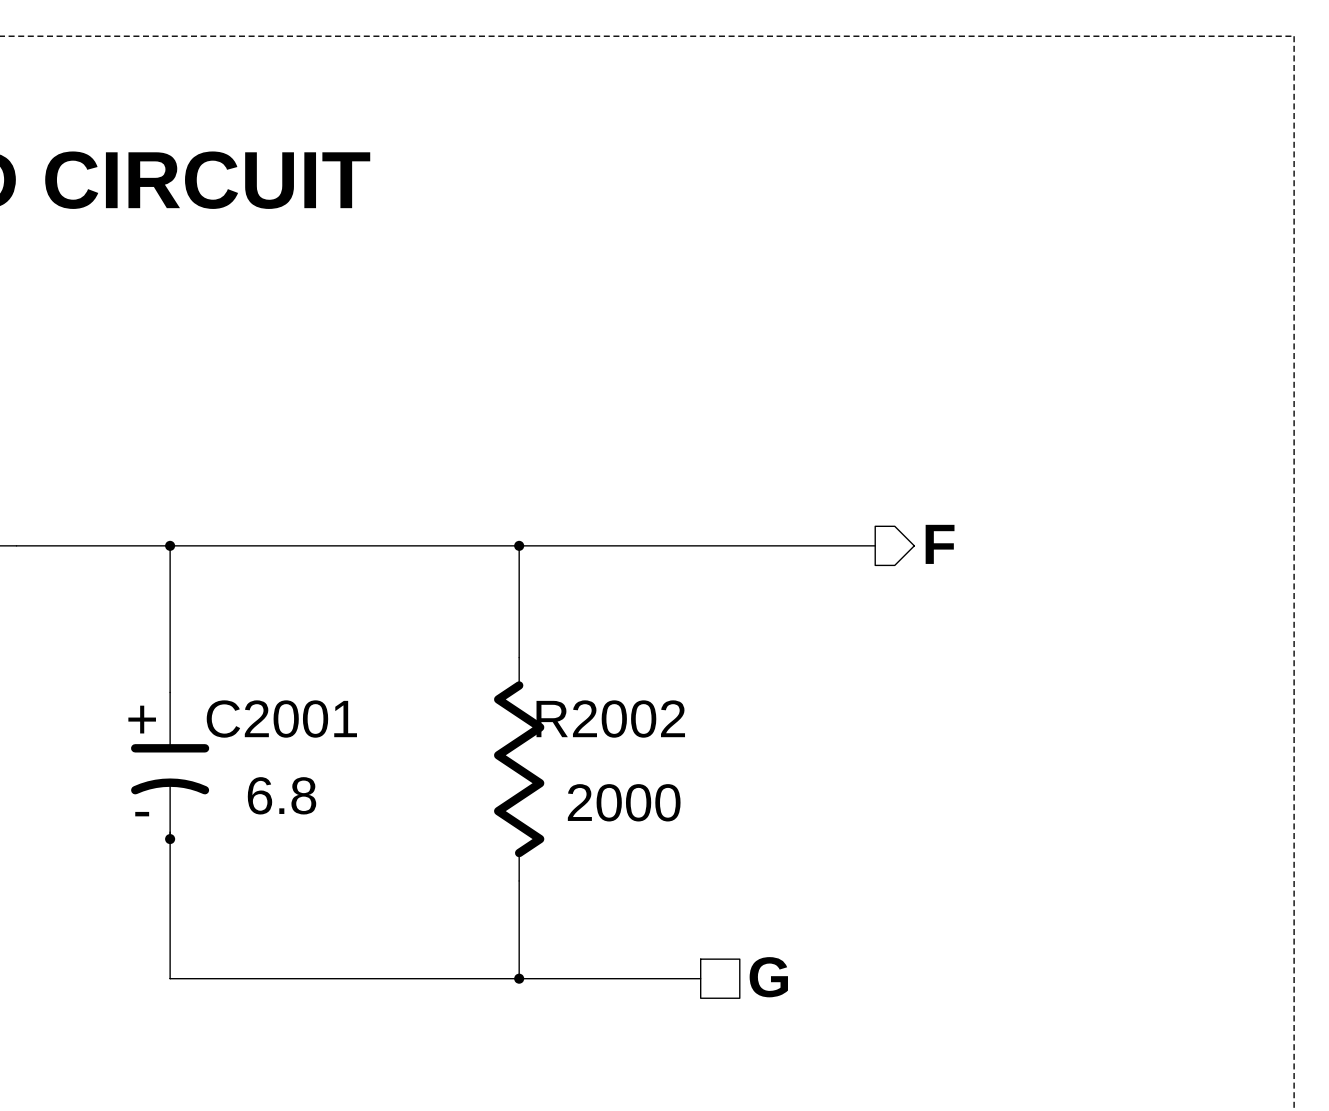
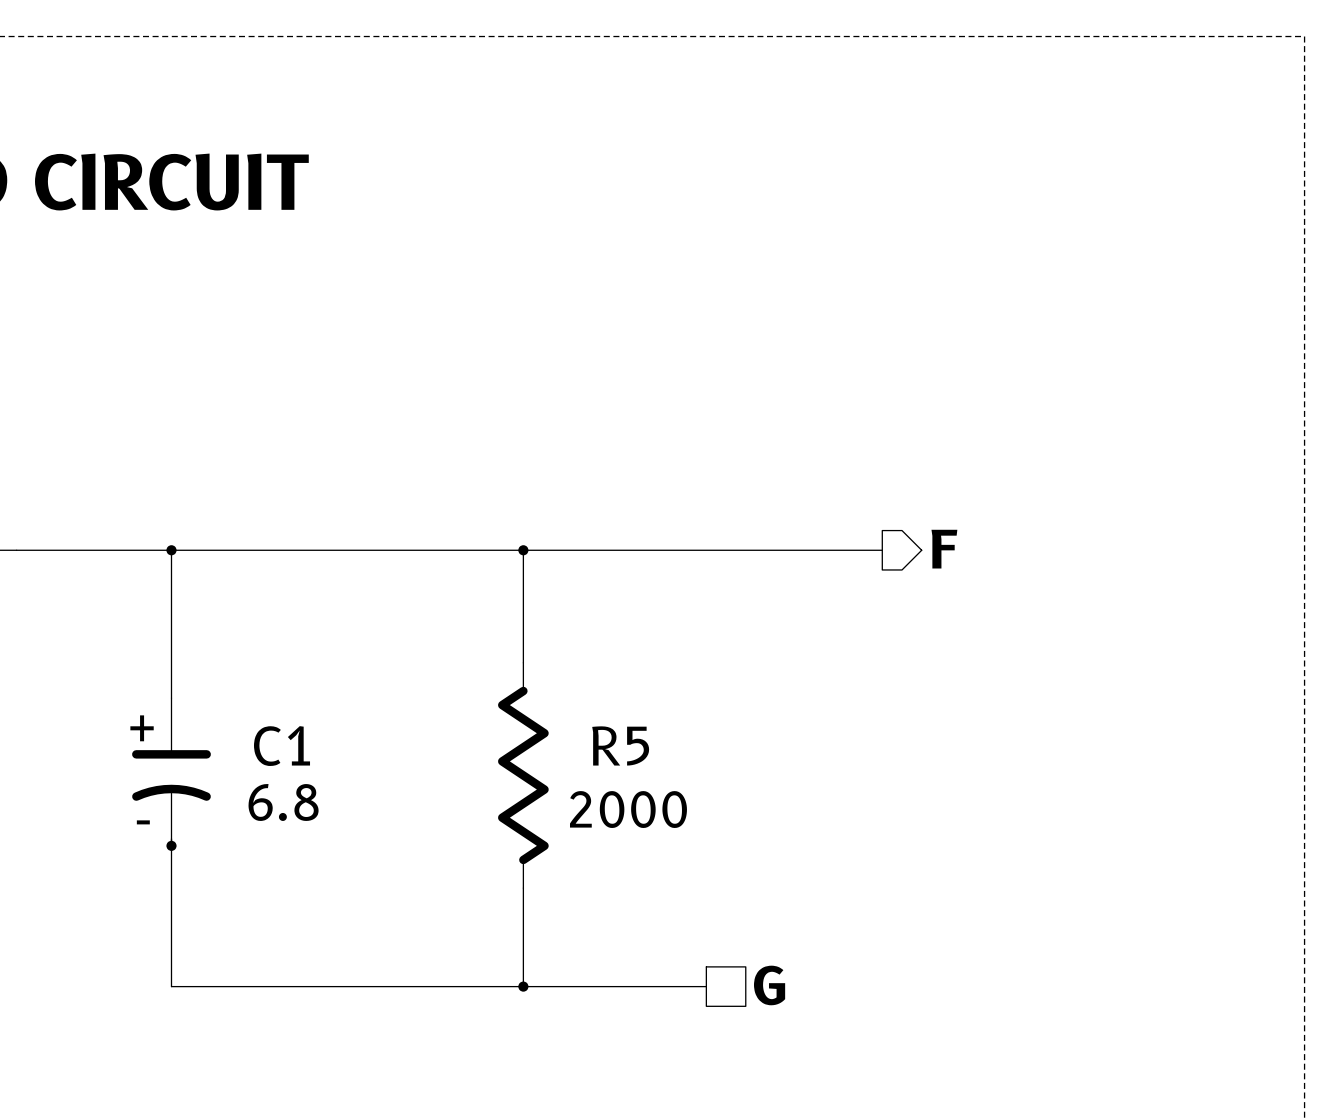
C2001 name: C2001 (281, 719) -> none
R2002 name: R2002 (610, 719) -> none
C2001 text: none -> C1 (282, 746)
R2002 text: none -> R5 (620, 745)

